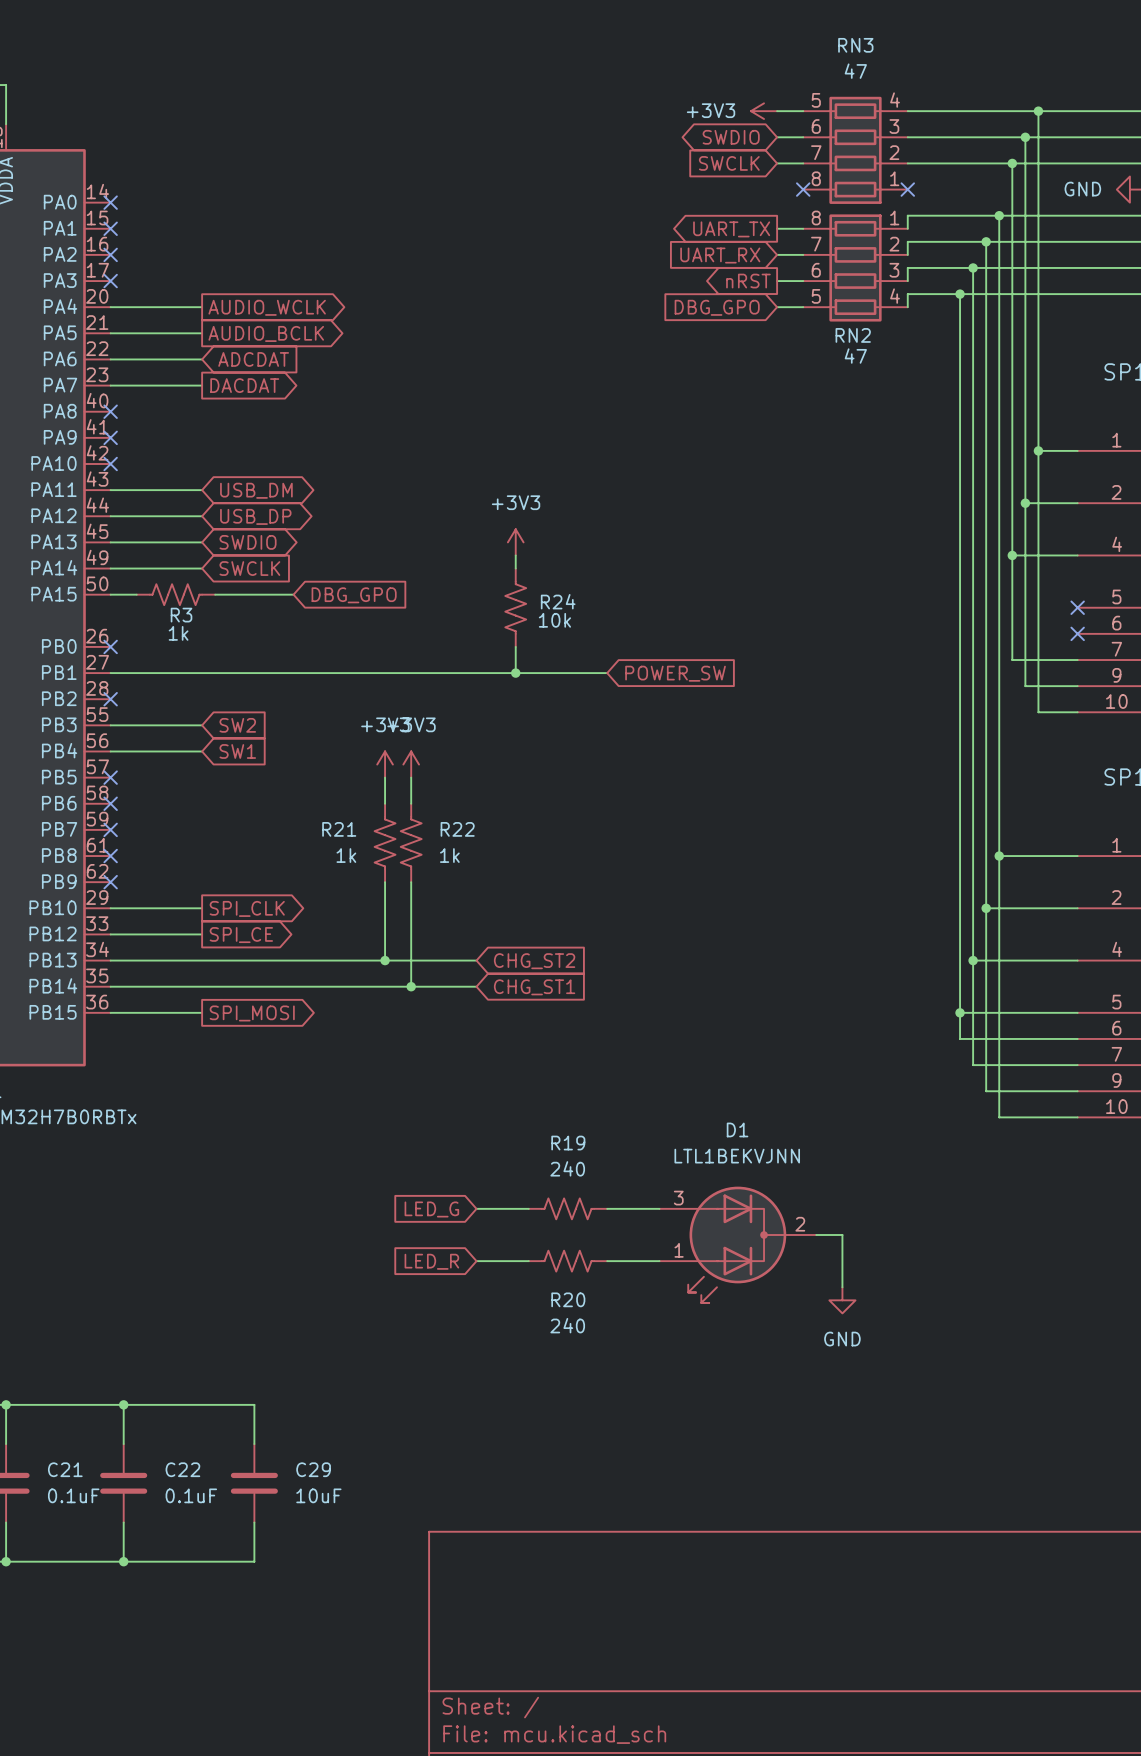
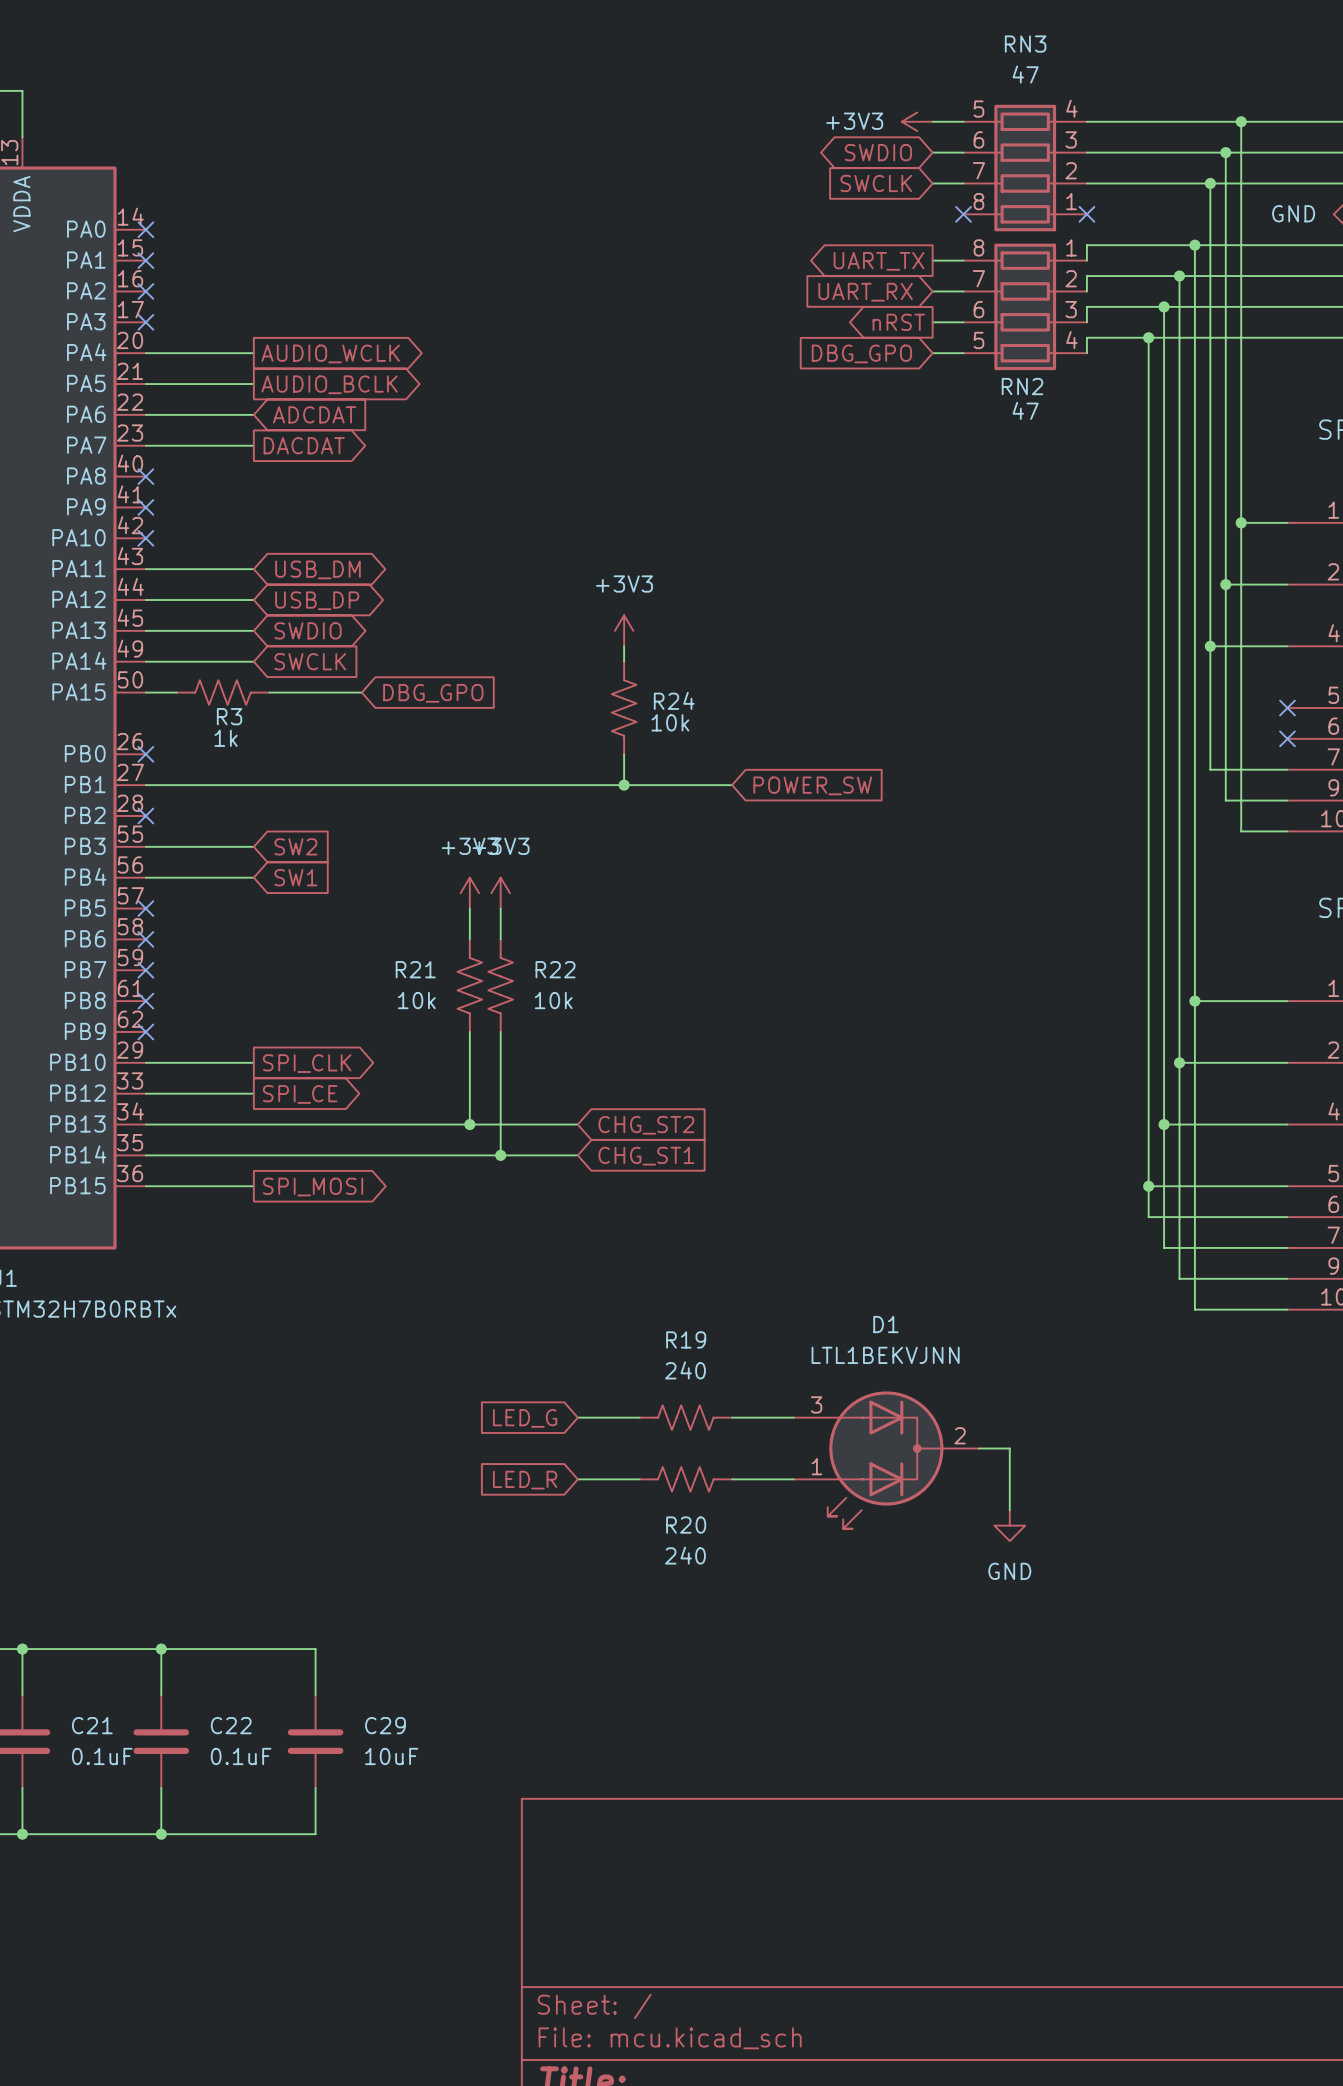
R21 value: 1k (346, 855) -> 10k (416, 1000)
R22 value: 1k (449, 855) -> 10k (553, 1000)

